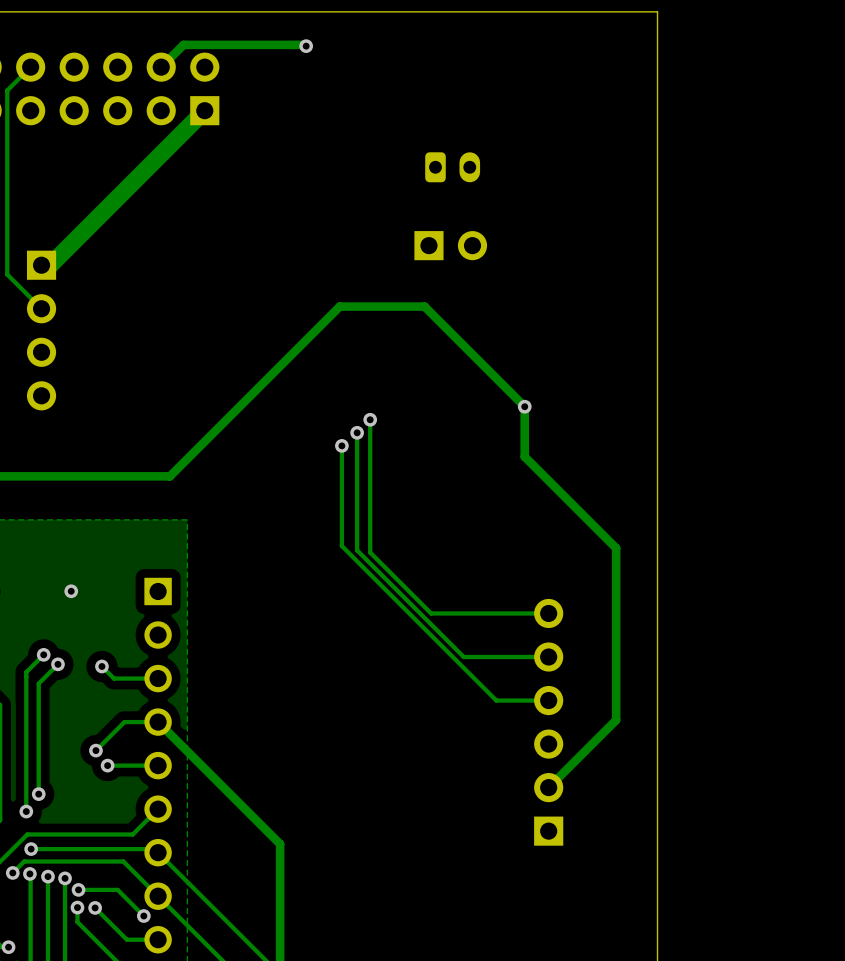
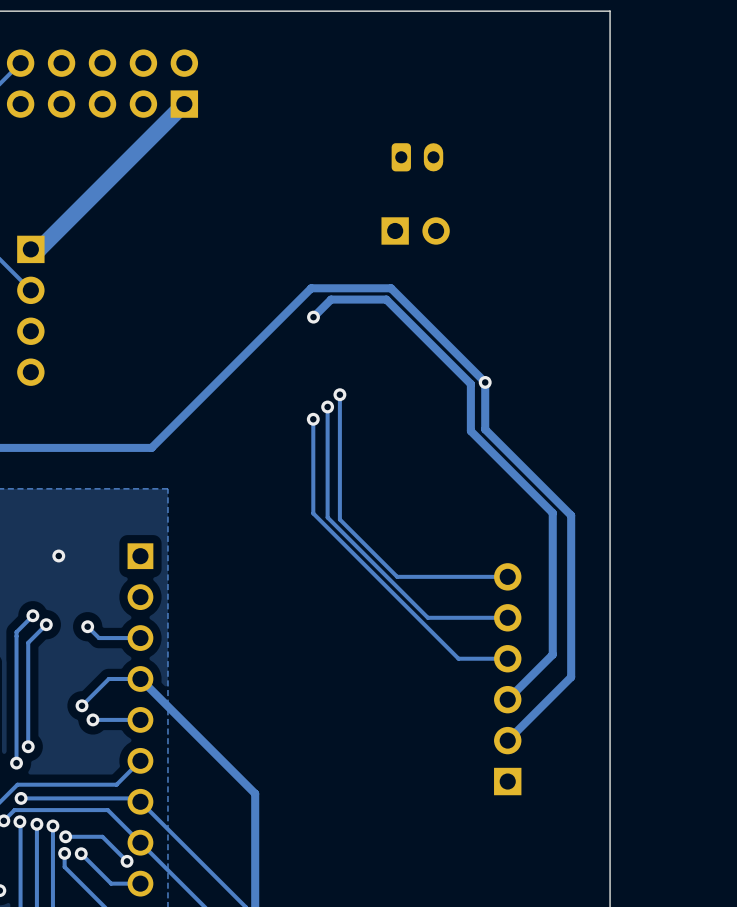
track: (306, 46) (183, 44) (161, 67) -> none
via: (306, 46) -> none
track: none -> (313, 317) (331, 299) (386, 299) (470, 384) (470, 431) (552, 512) (552, 654) (507, 699)
via: none -> (313, 317)

